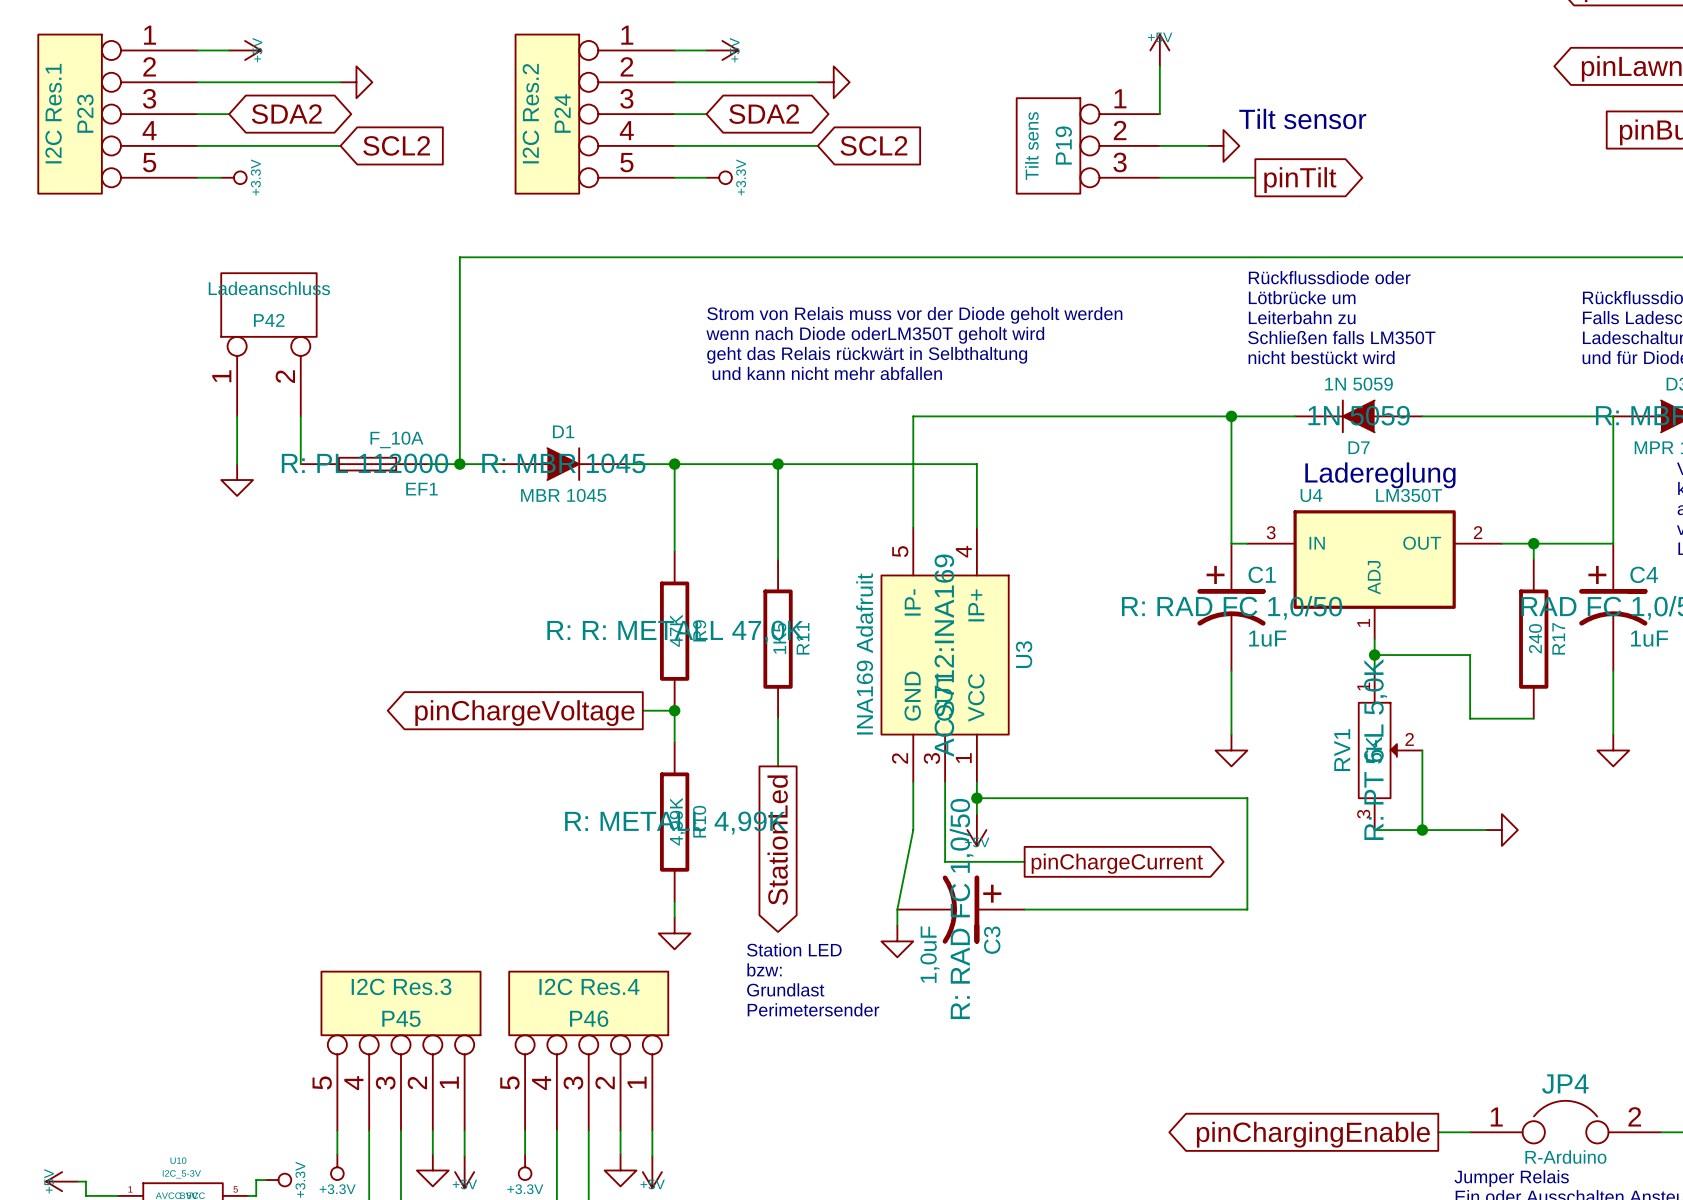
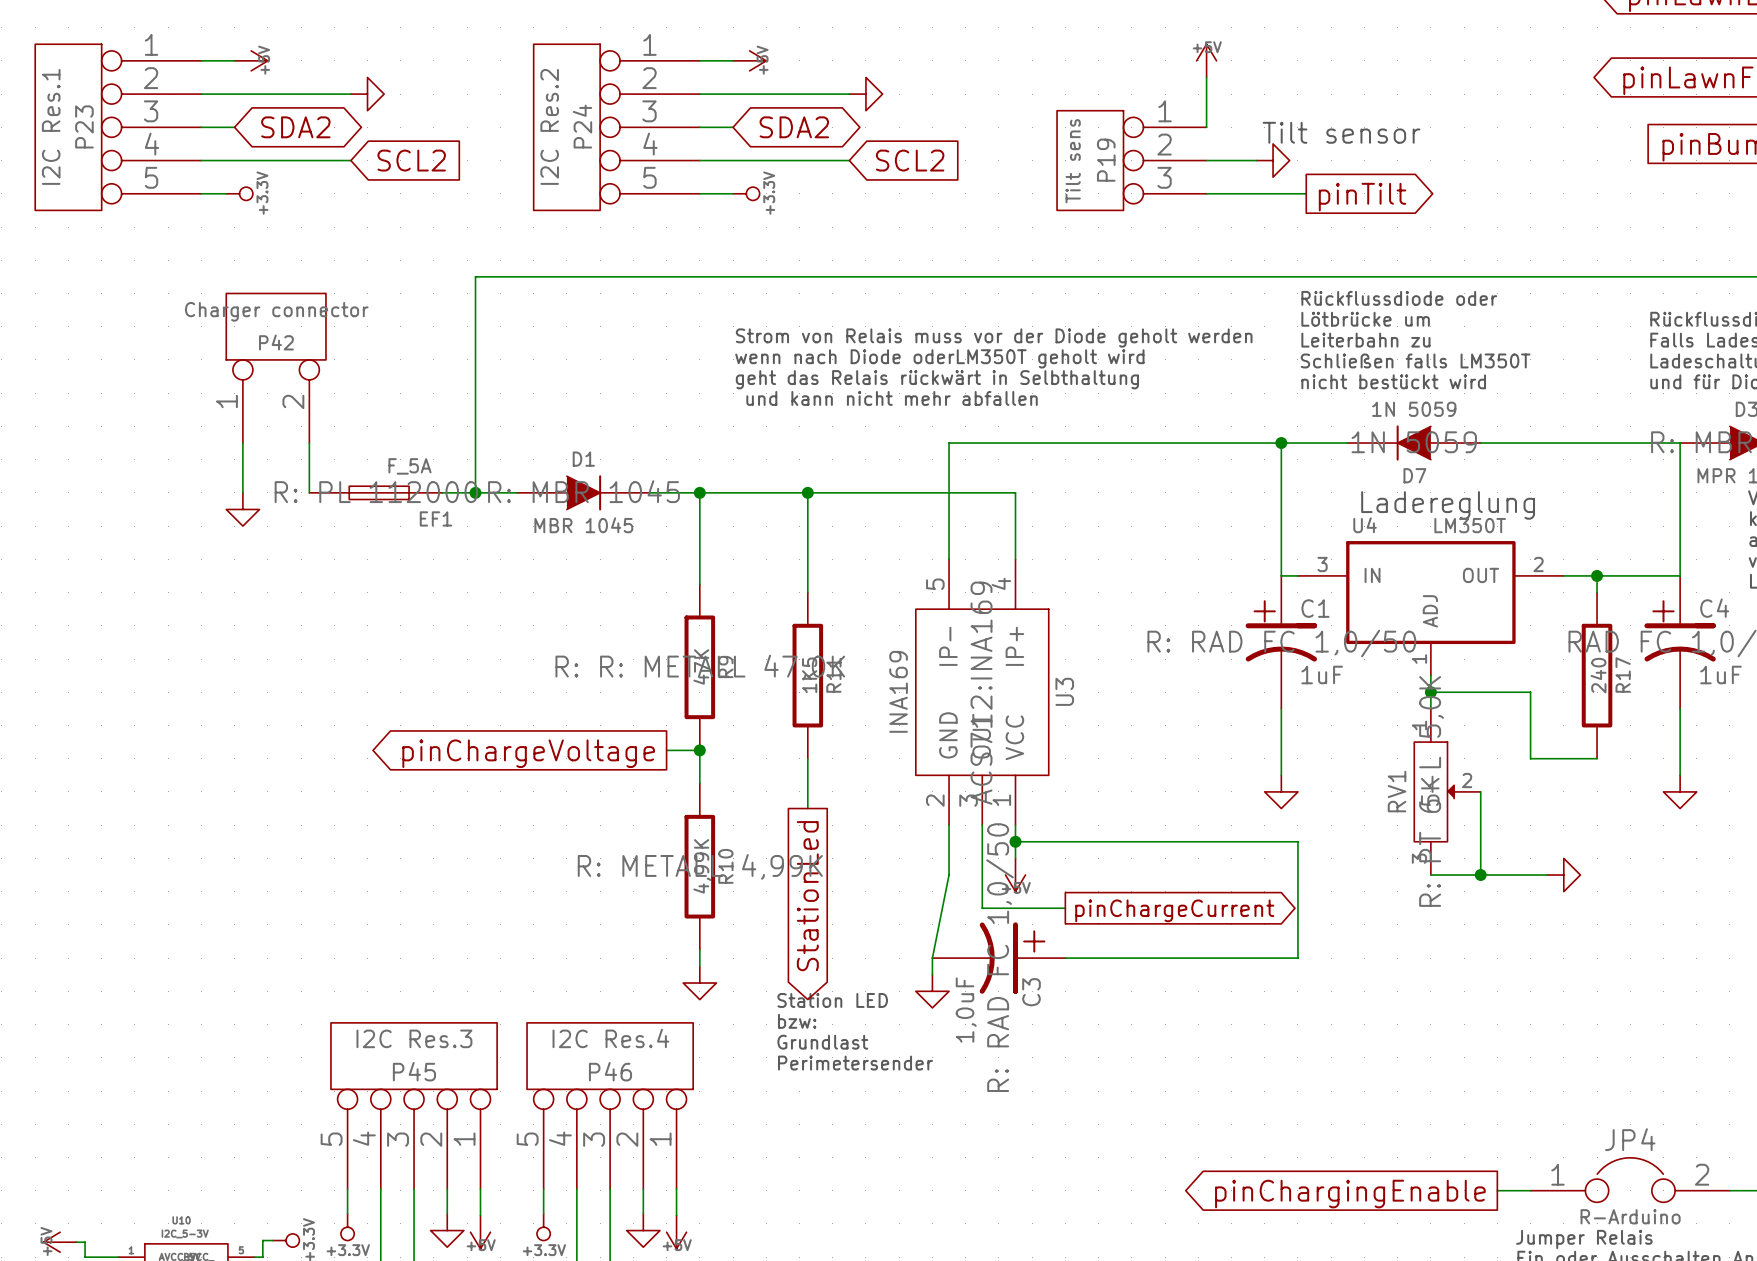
P42 value: Ladeanschluss (269, 288) -> Charger connector (276, 311)
EF1 value: F_10A (396, 439) -> F_5A (410, 466)
U3 value: INA169 Adafruit (864, 654) -> INA169 (898, 691)

